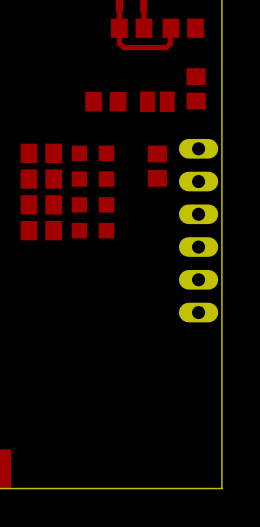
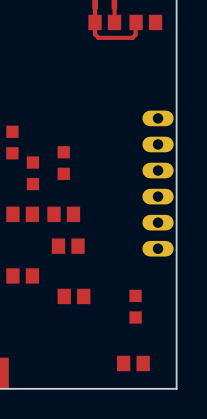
part: (196, 88) -> none
part: (105, 101) -> none
part: (157, 101) -> none
part: (41, 153) -> none
part: (92, 153) -> none
part: (157, 166) -> none
part: none -> (12, 142)
part: (41, 179) -> none
part: (92, 179) -> none
part: (41, 204) -> none
part rotation: 0° (92, 204) -> 90° clockwise (63, 163)
part: none -> (32, 173)
part: (41, 230) -> none
part: (92, 230) -> none
part: none -> (22, 214)
part: none -> (63, 214)
part: none -> (68, 246)
part: none -> (22, 275)
part: none -> (73, 296)
part: none -> (135, 306)
part: none -> (133, 363)

